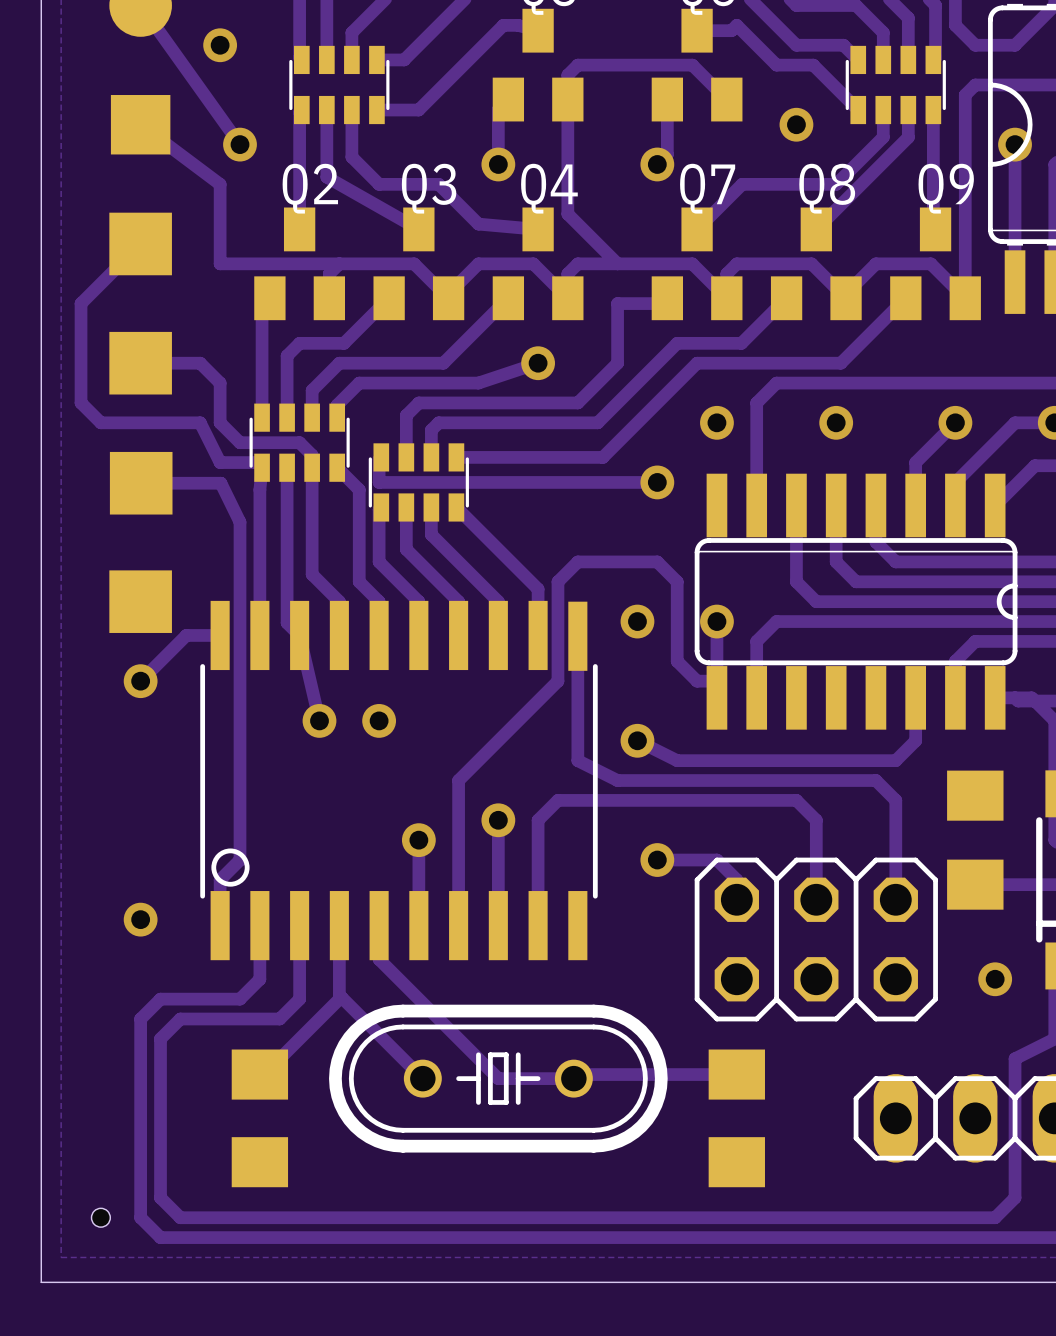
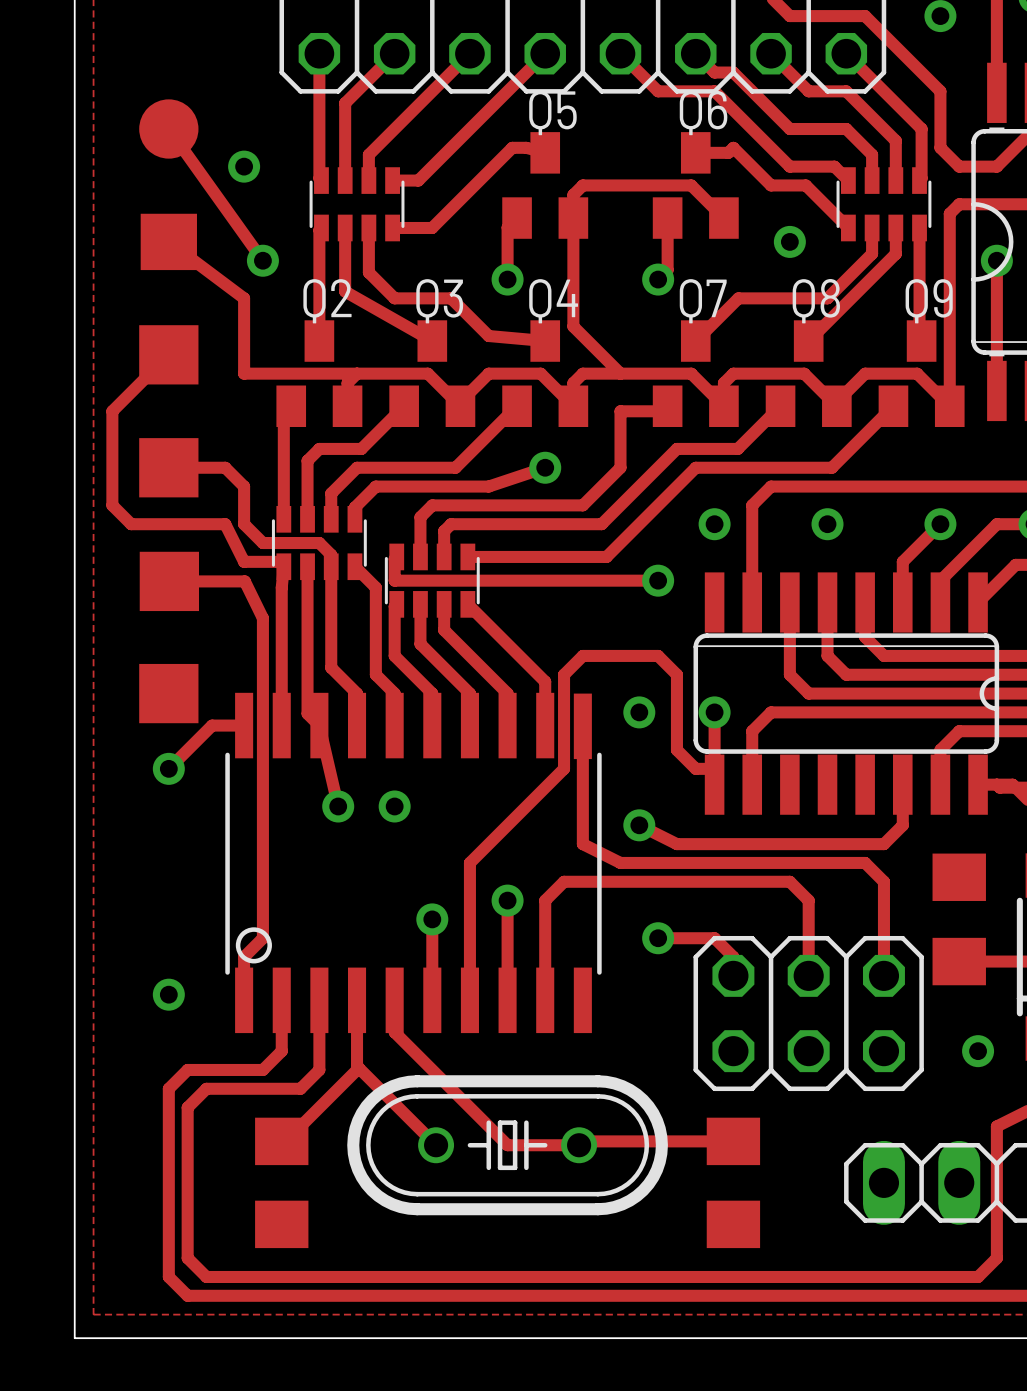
hole: (100, 1217) -> none

